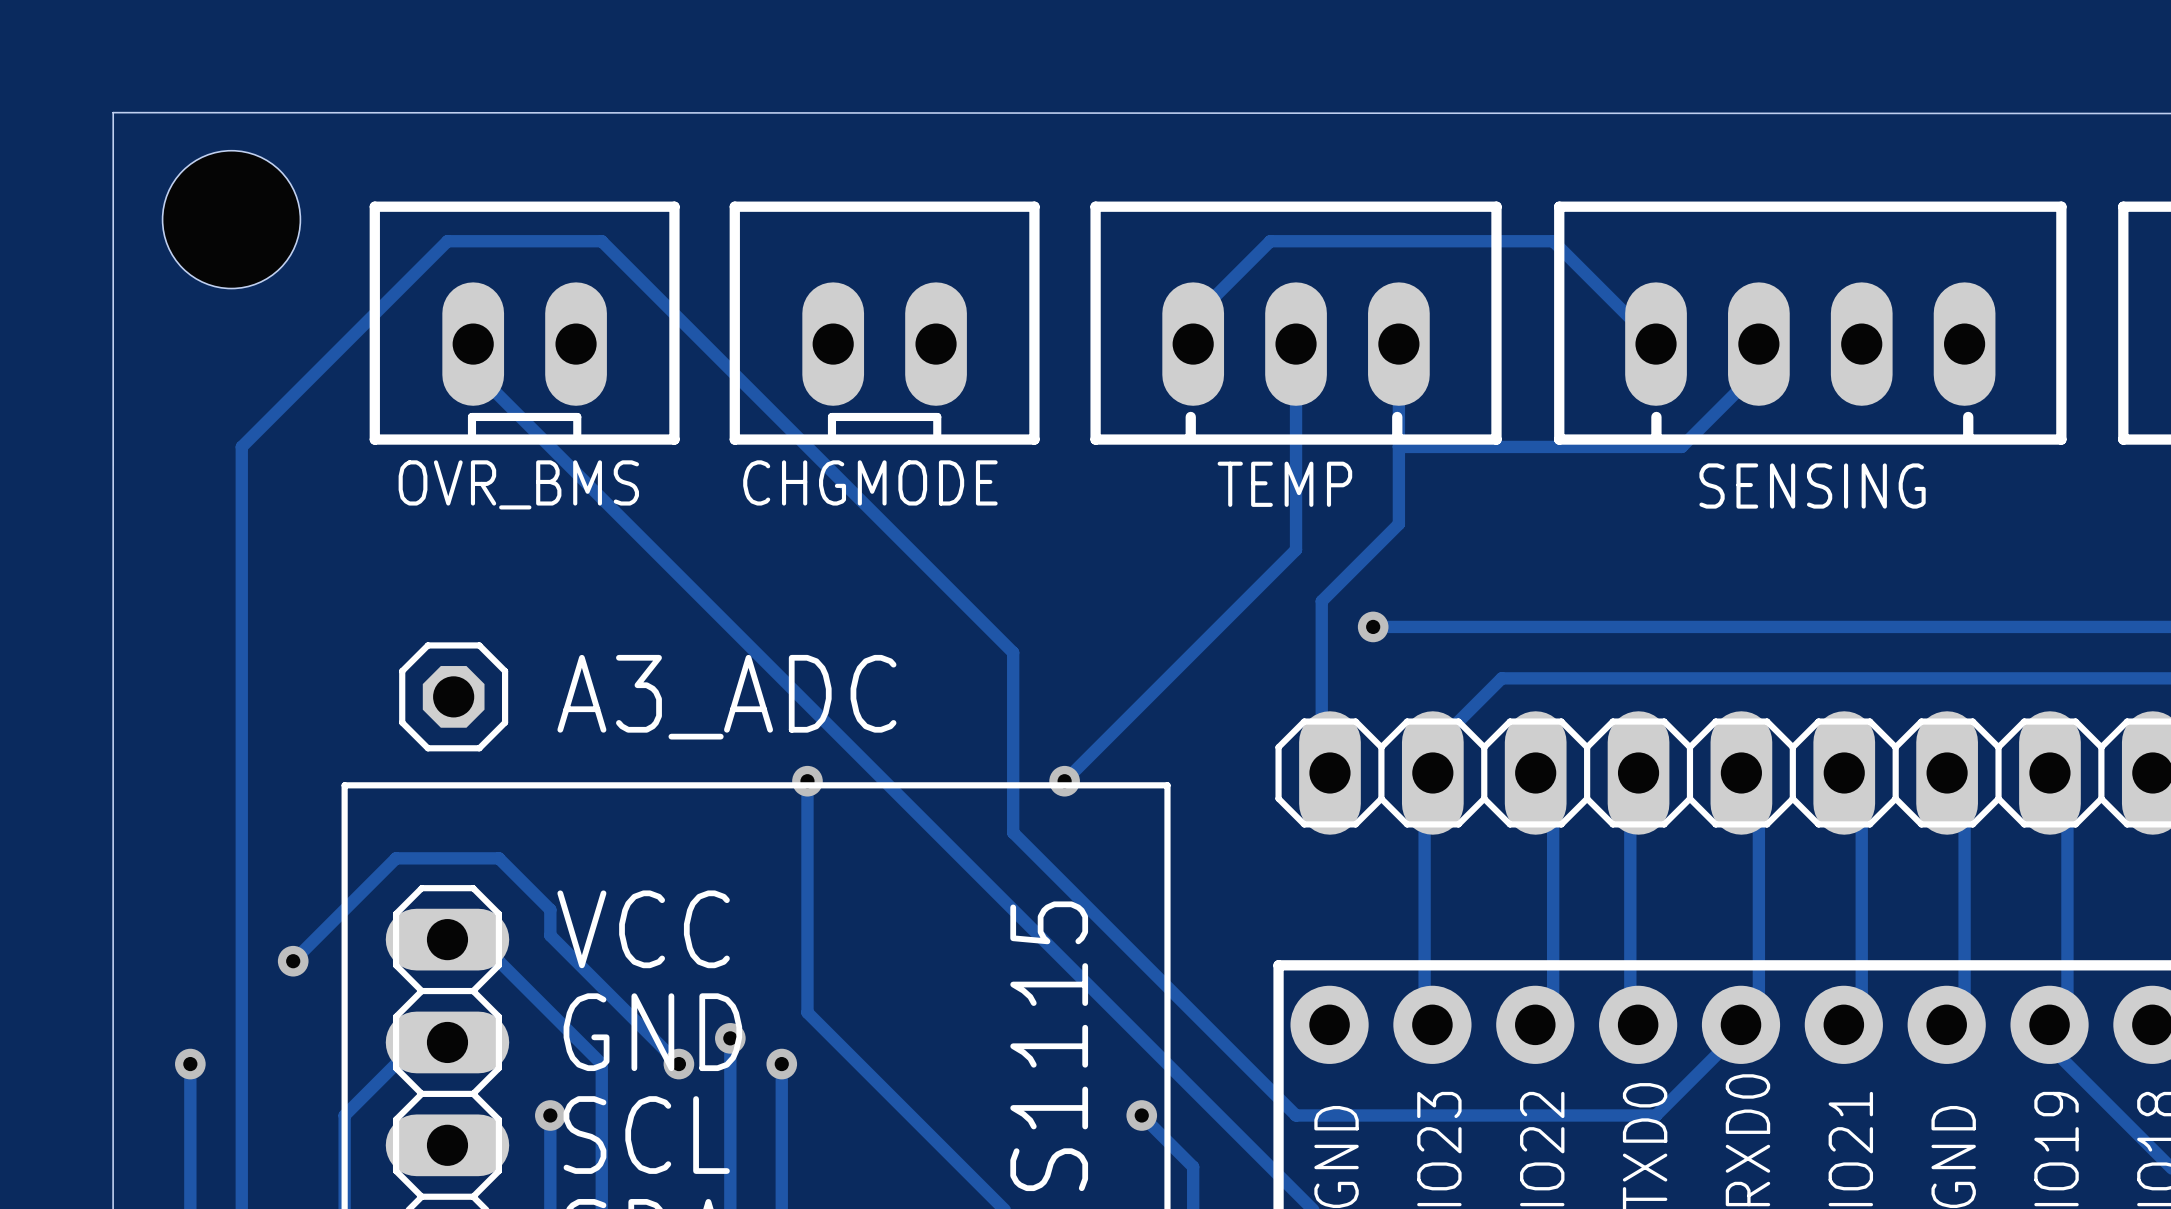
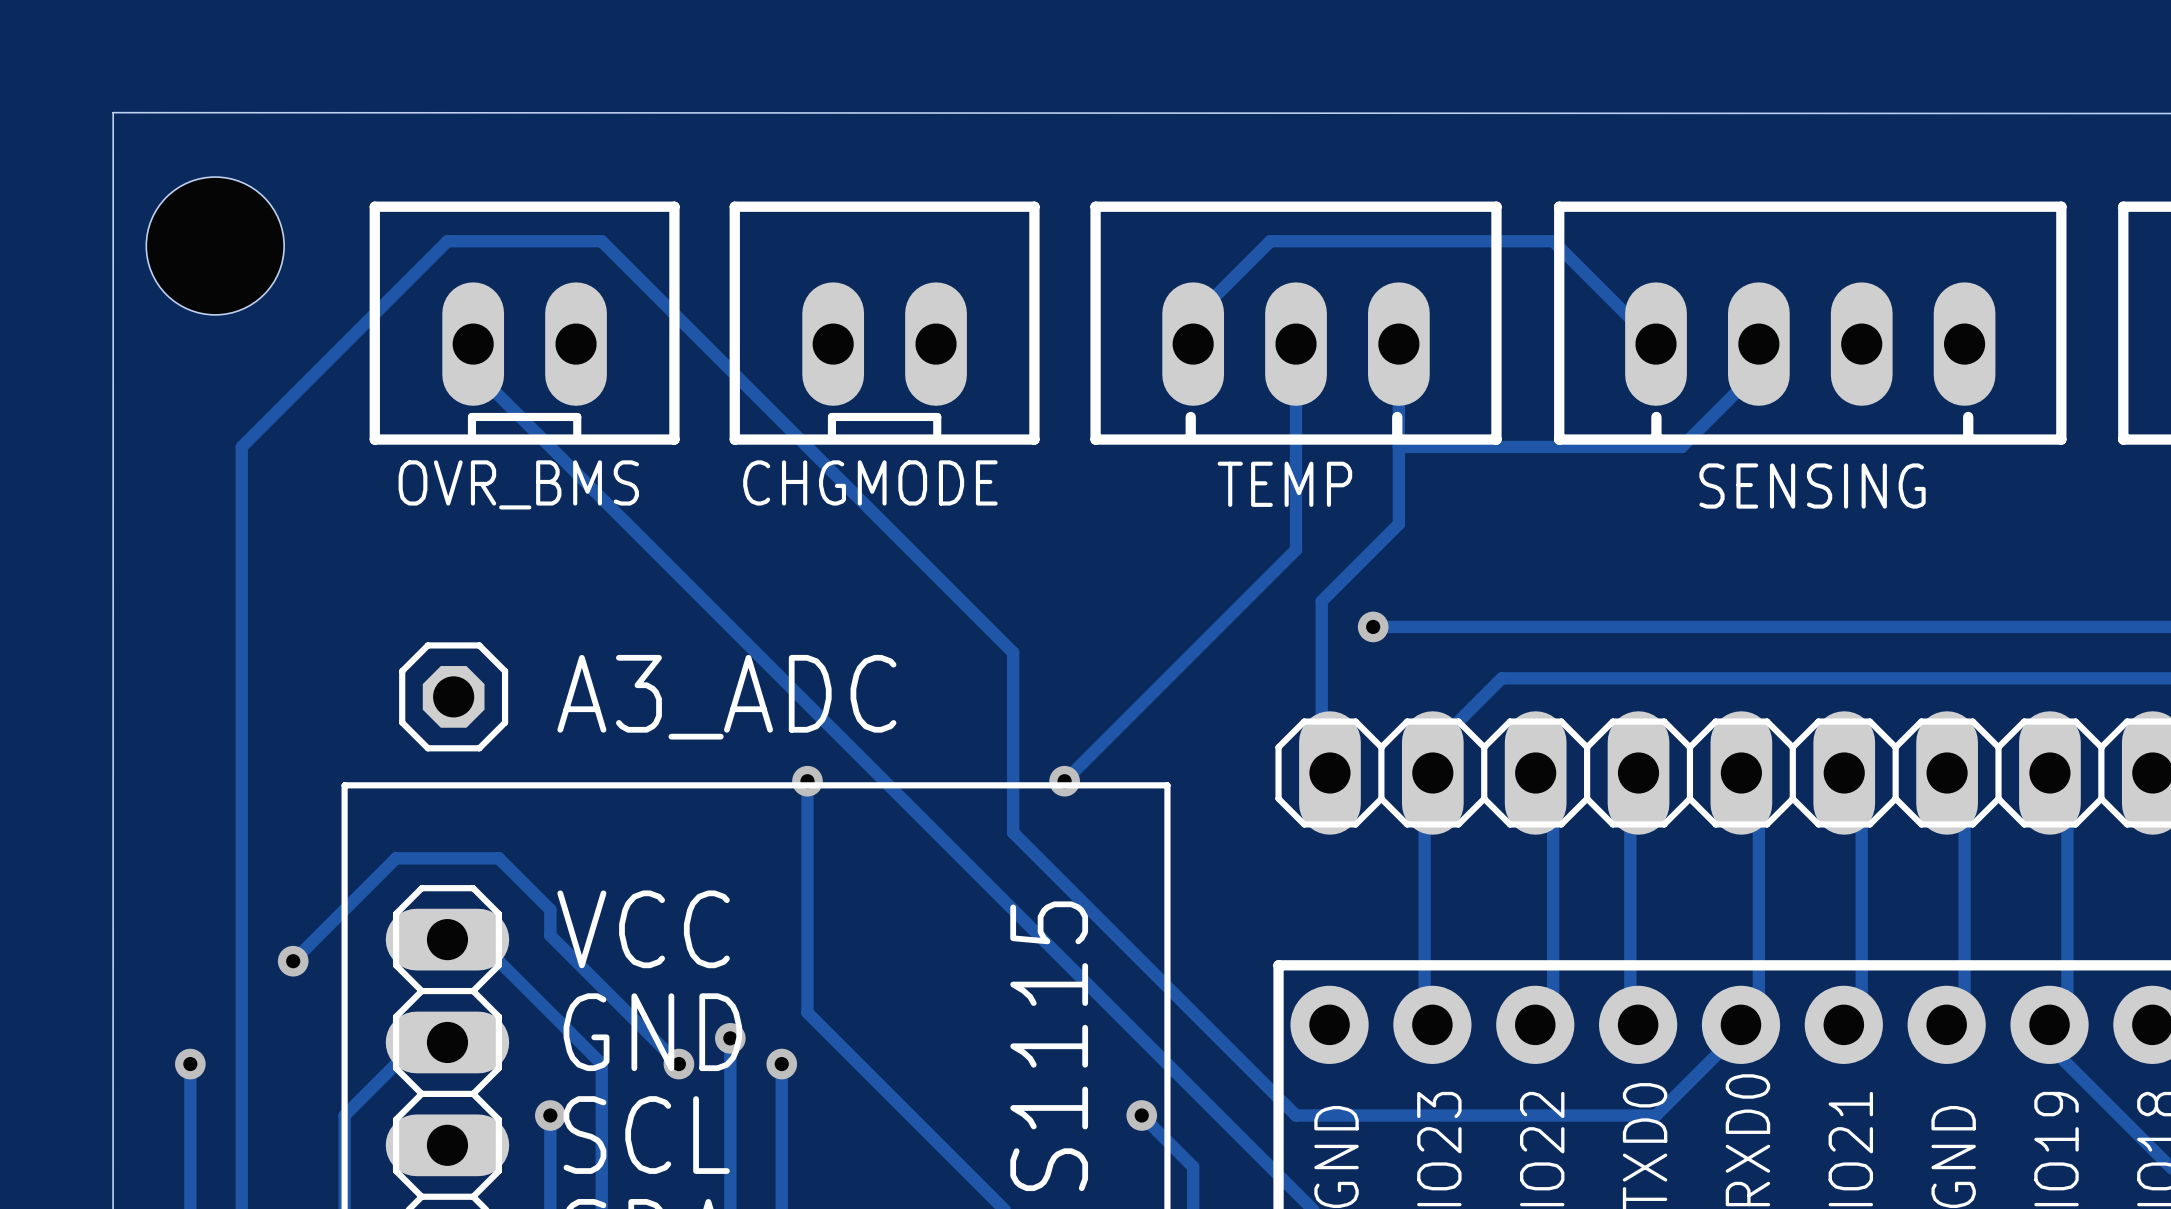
hole position: (231, 219) -> (215, 245)

